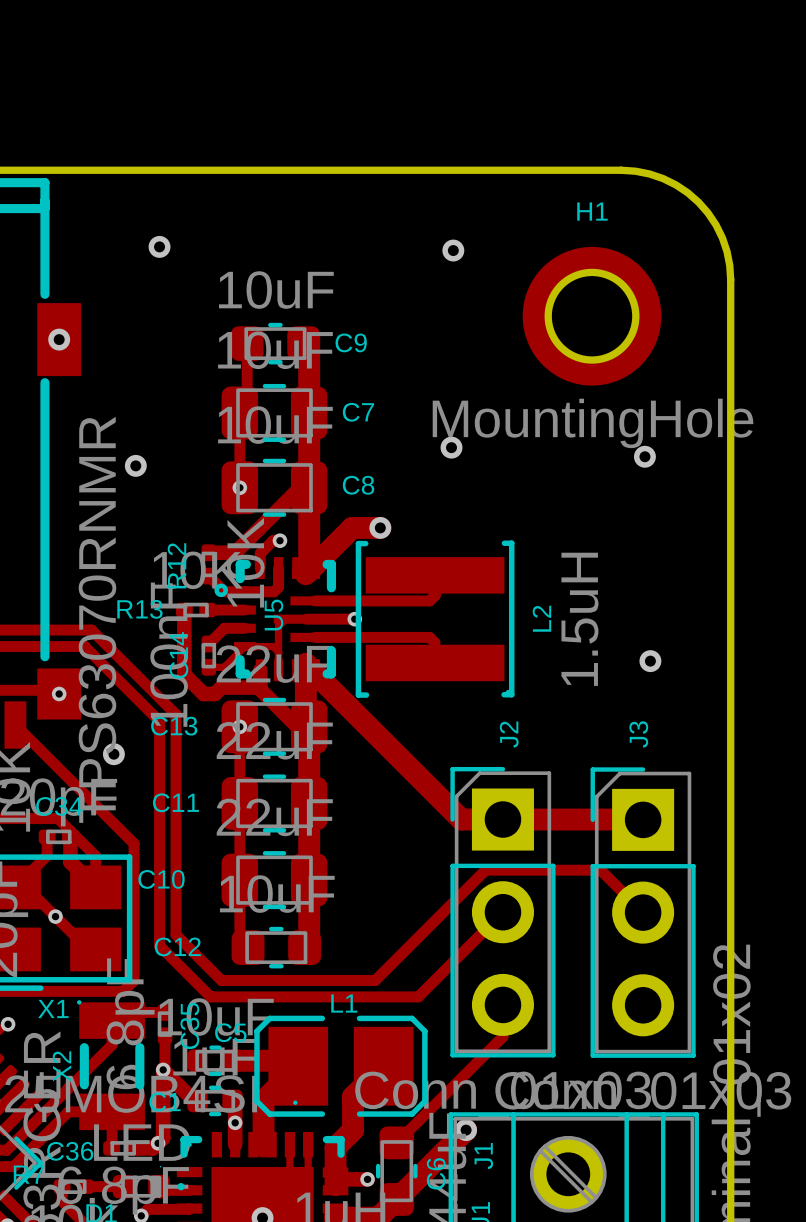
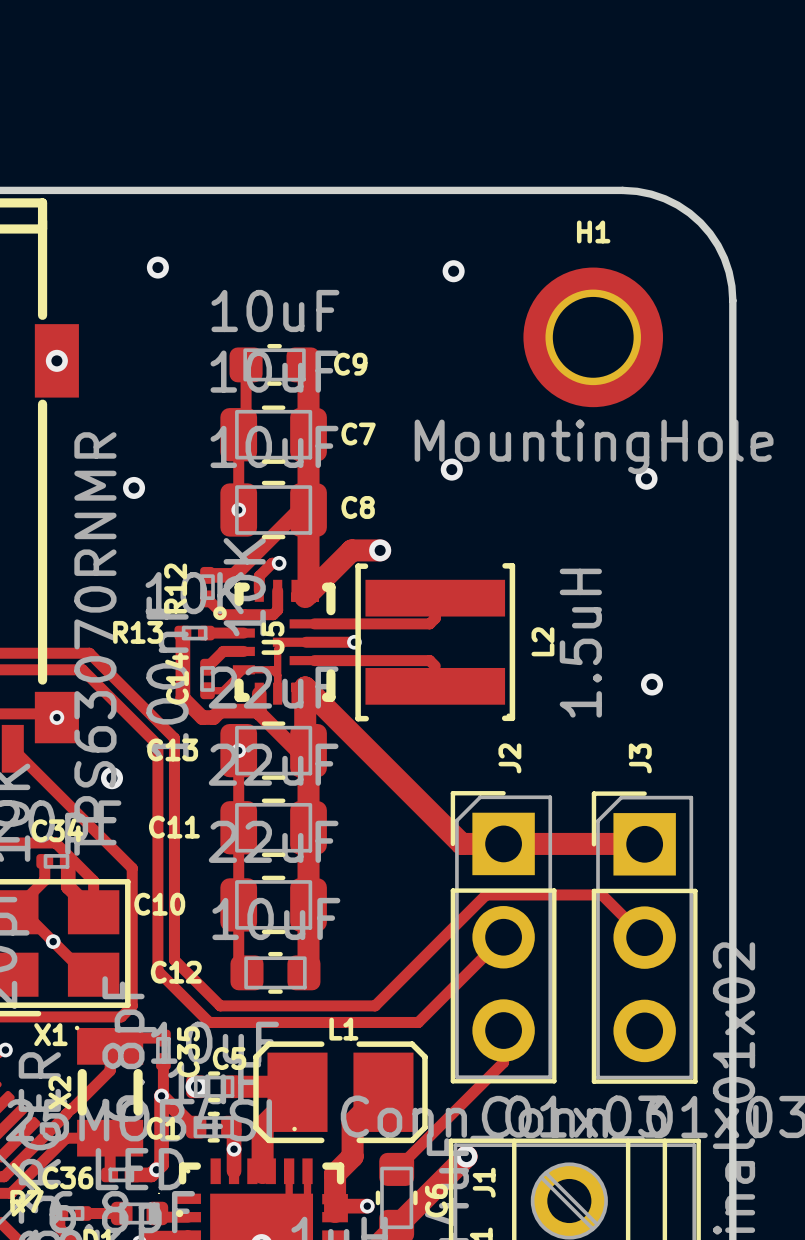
via: none -> (196, 1086)

